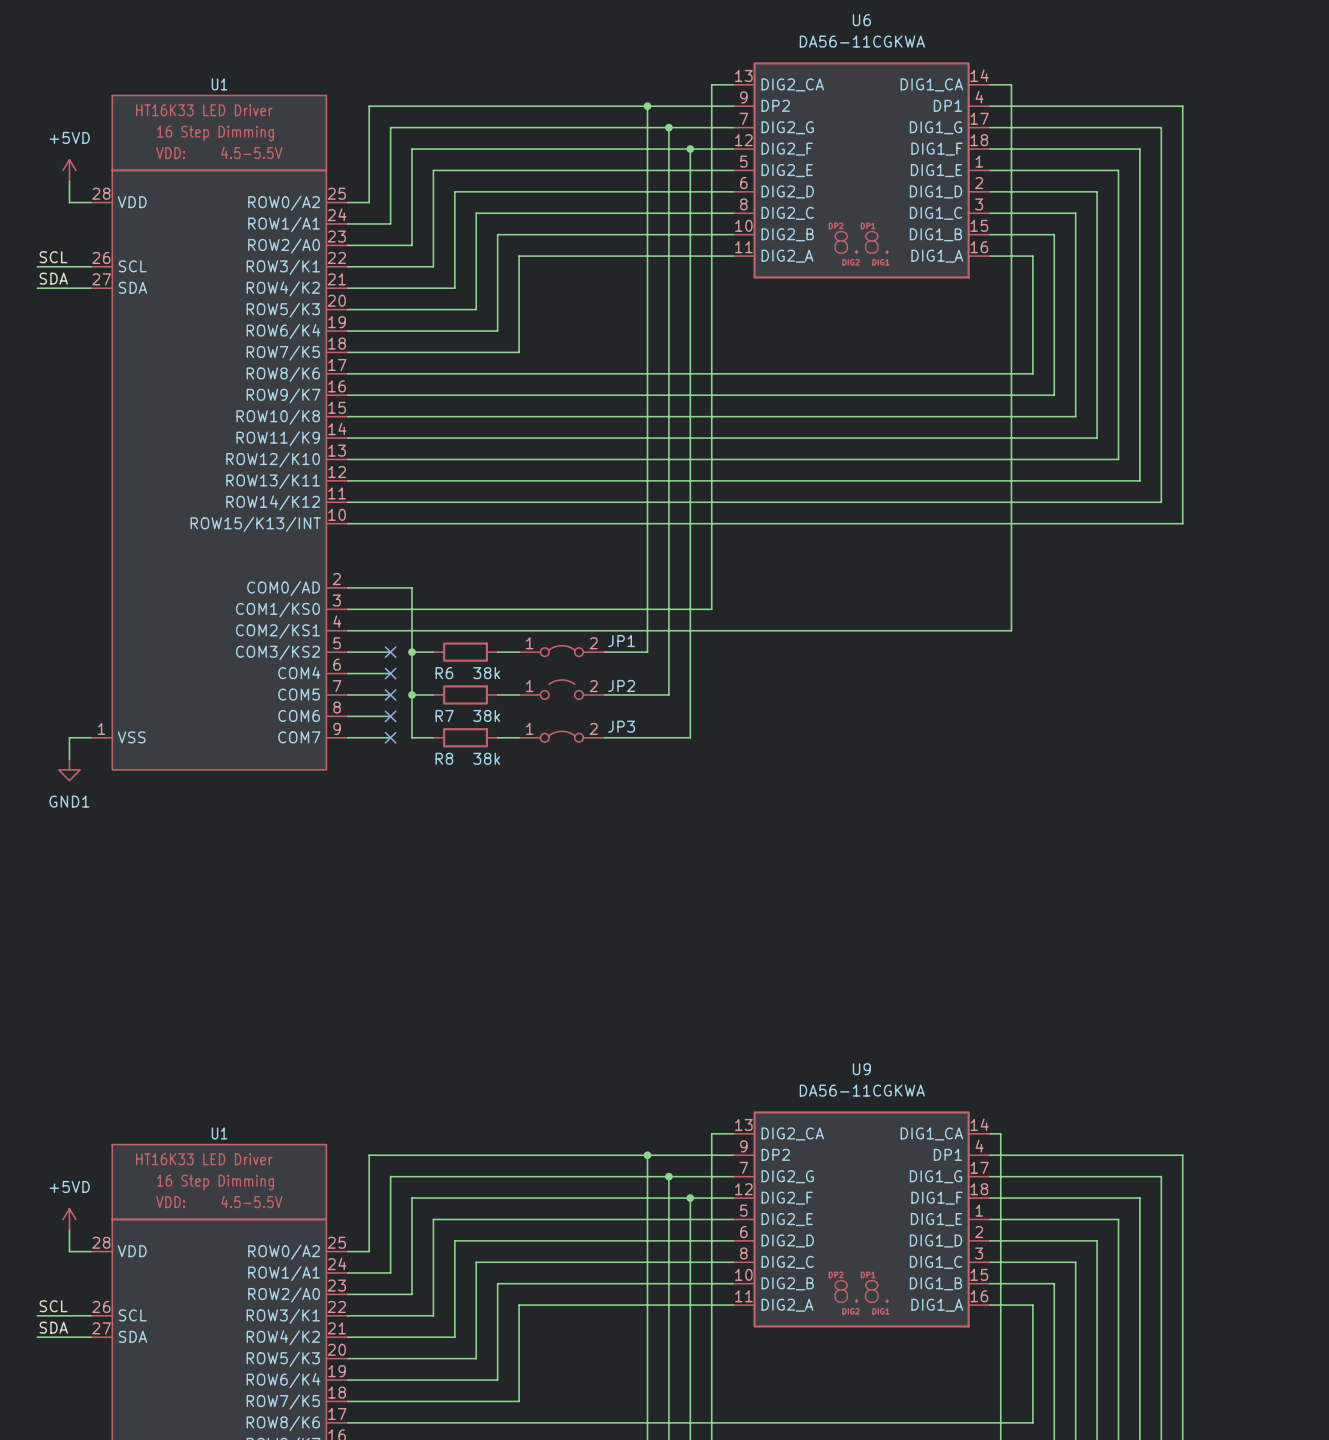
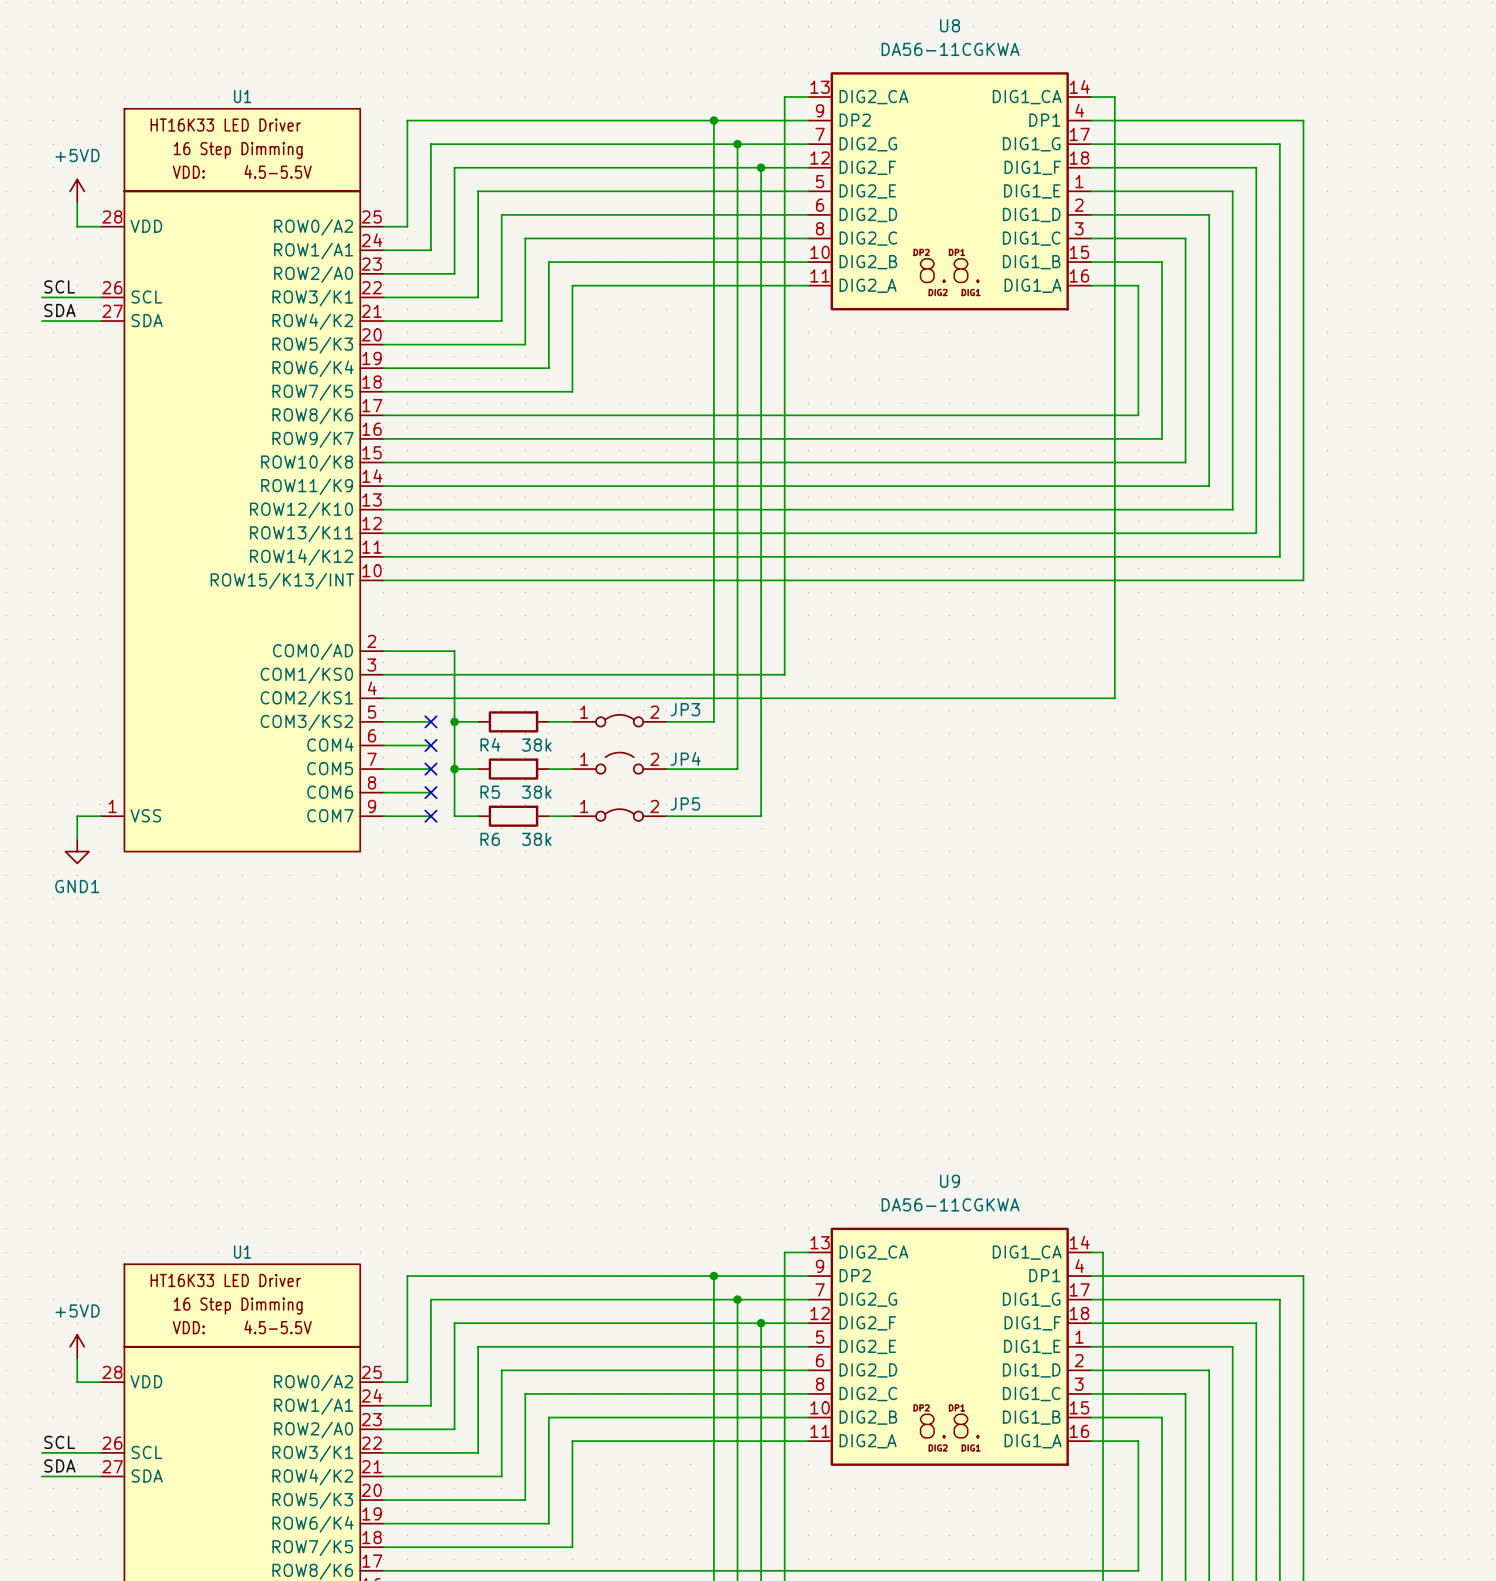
U6 name: U6 (861, 20) -> U8 (950, 25)
JP1 name: JP1 (621, 641) -> JP3 (685, 709)
R6 name: R6 (444, 673) -> R4 (490, 744)
JP2 name: JP2 (621, 685) -> JP4 (685, 758)
R7 name: R7 (444, 715) -> R5 (490, 792)
JP3 name: JP3 (621, 726) -> JP5 (685, 803)
R8 name: R8 (444, 758) -> R6 (490, 839)

